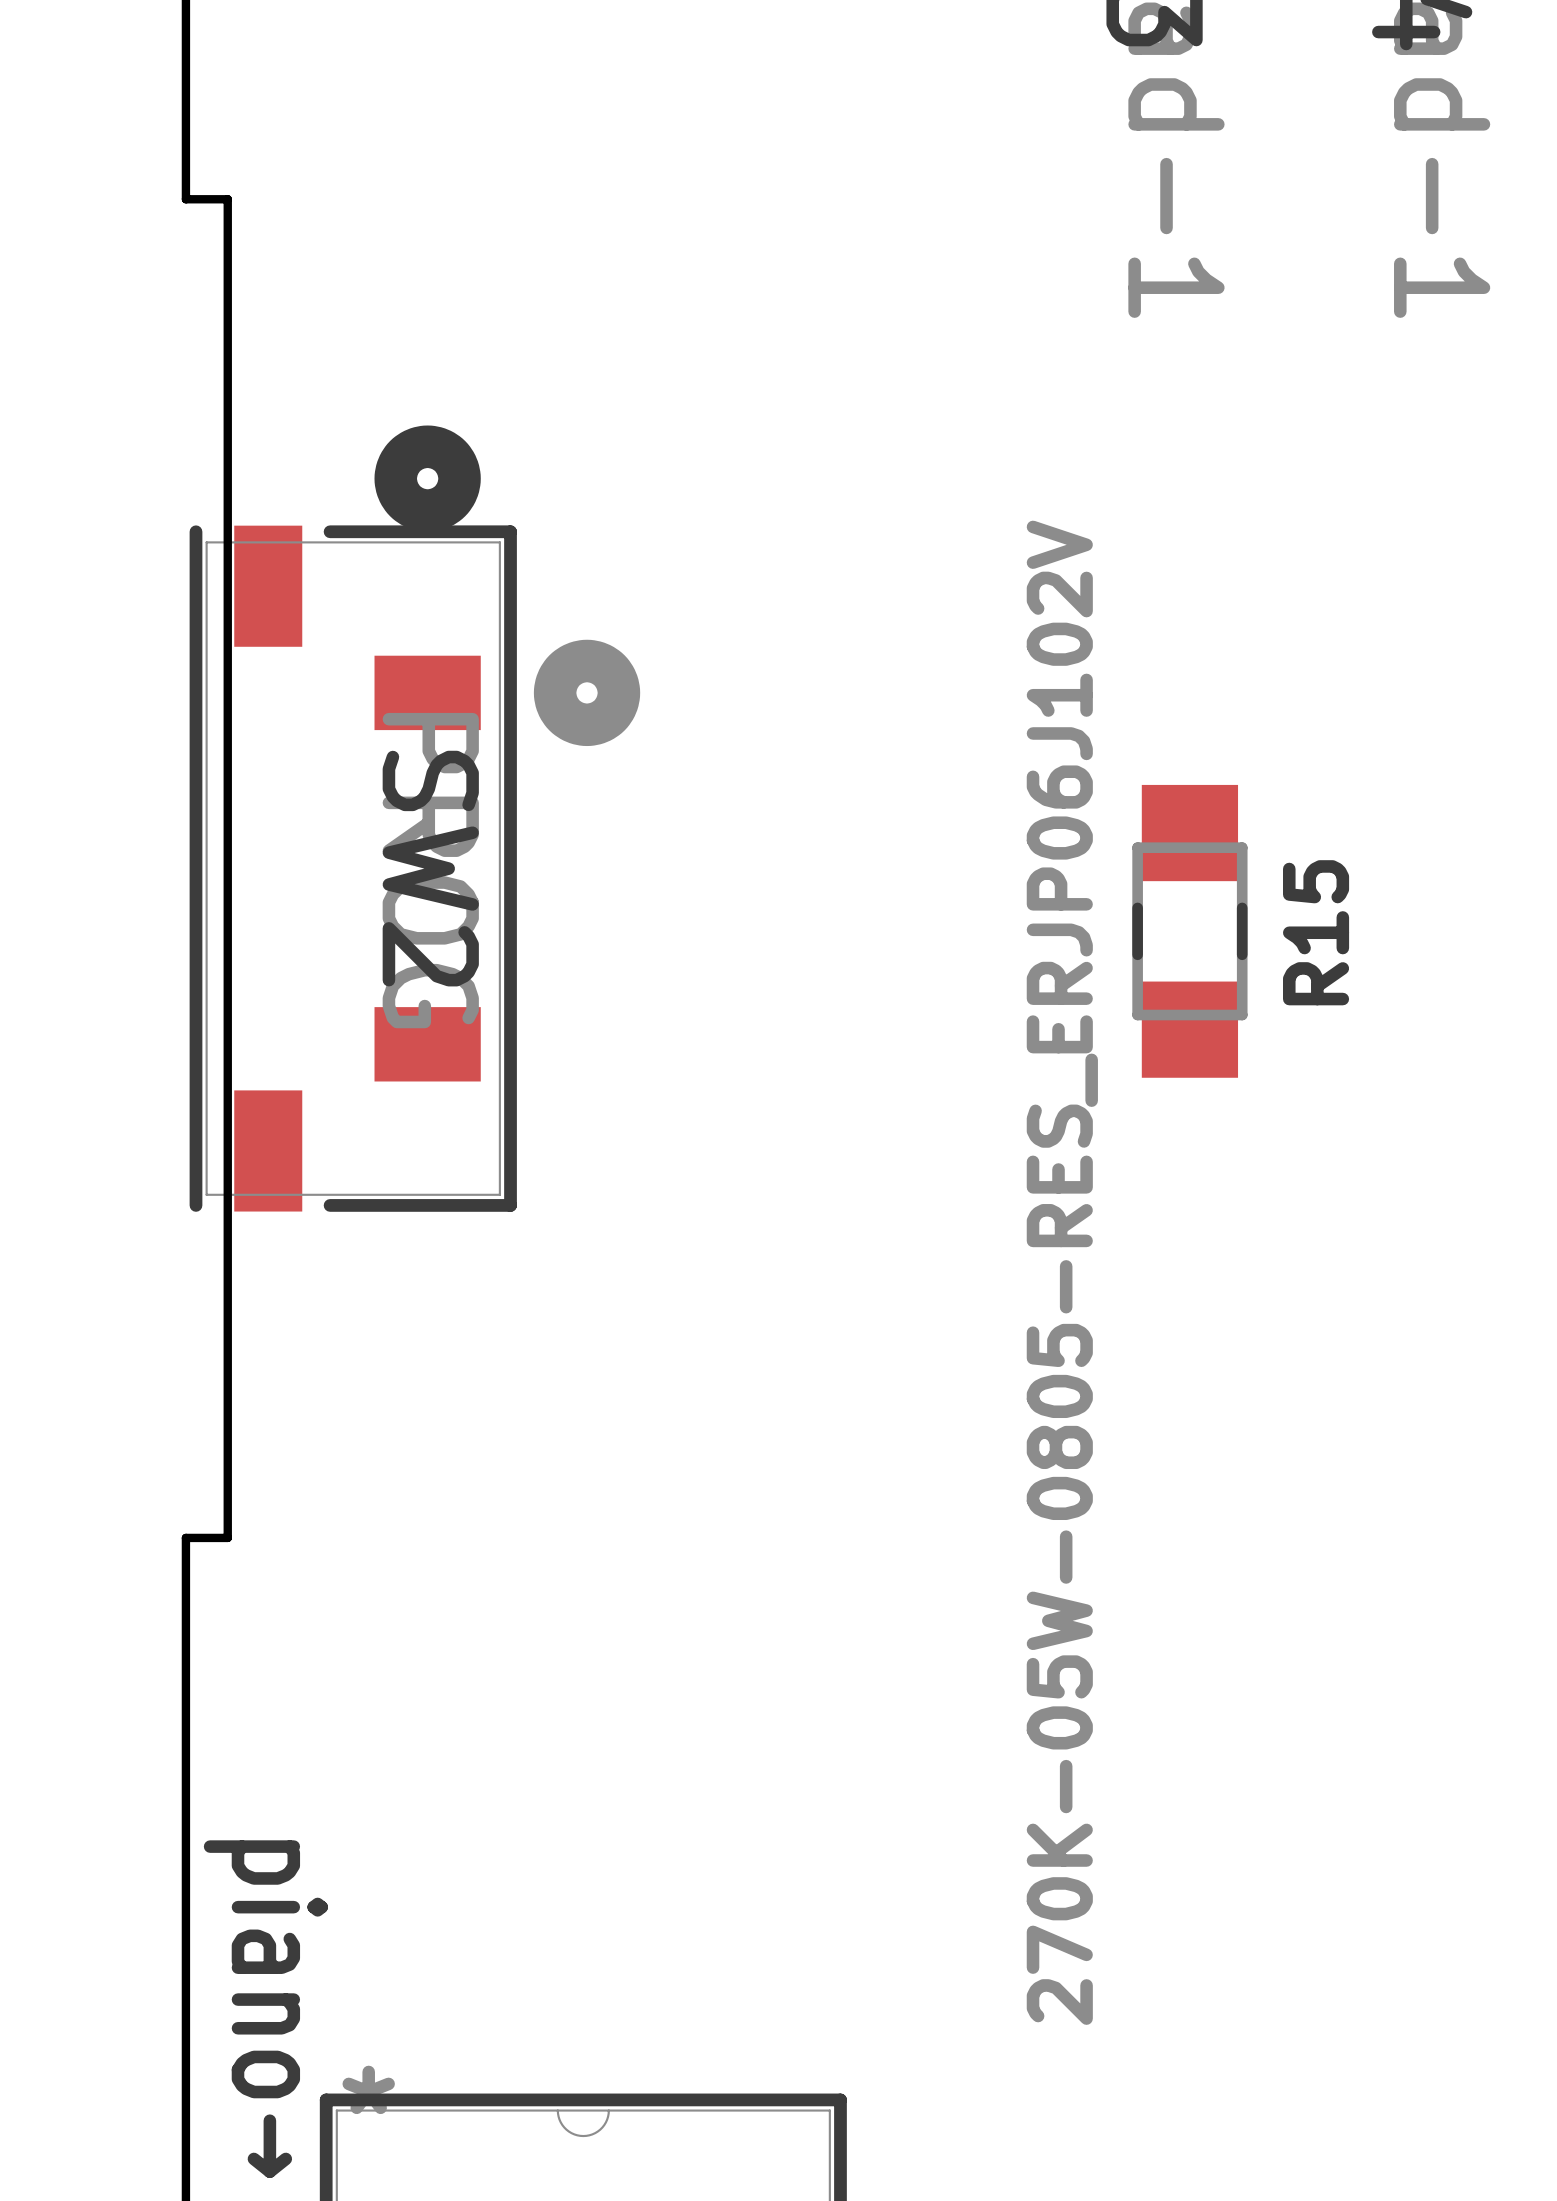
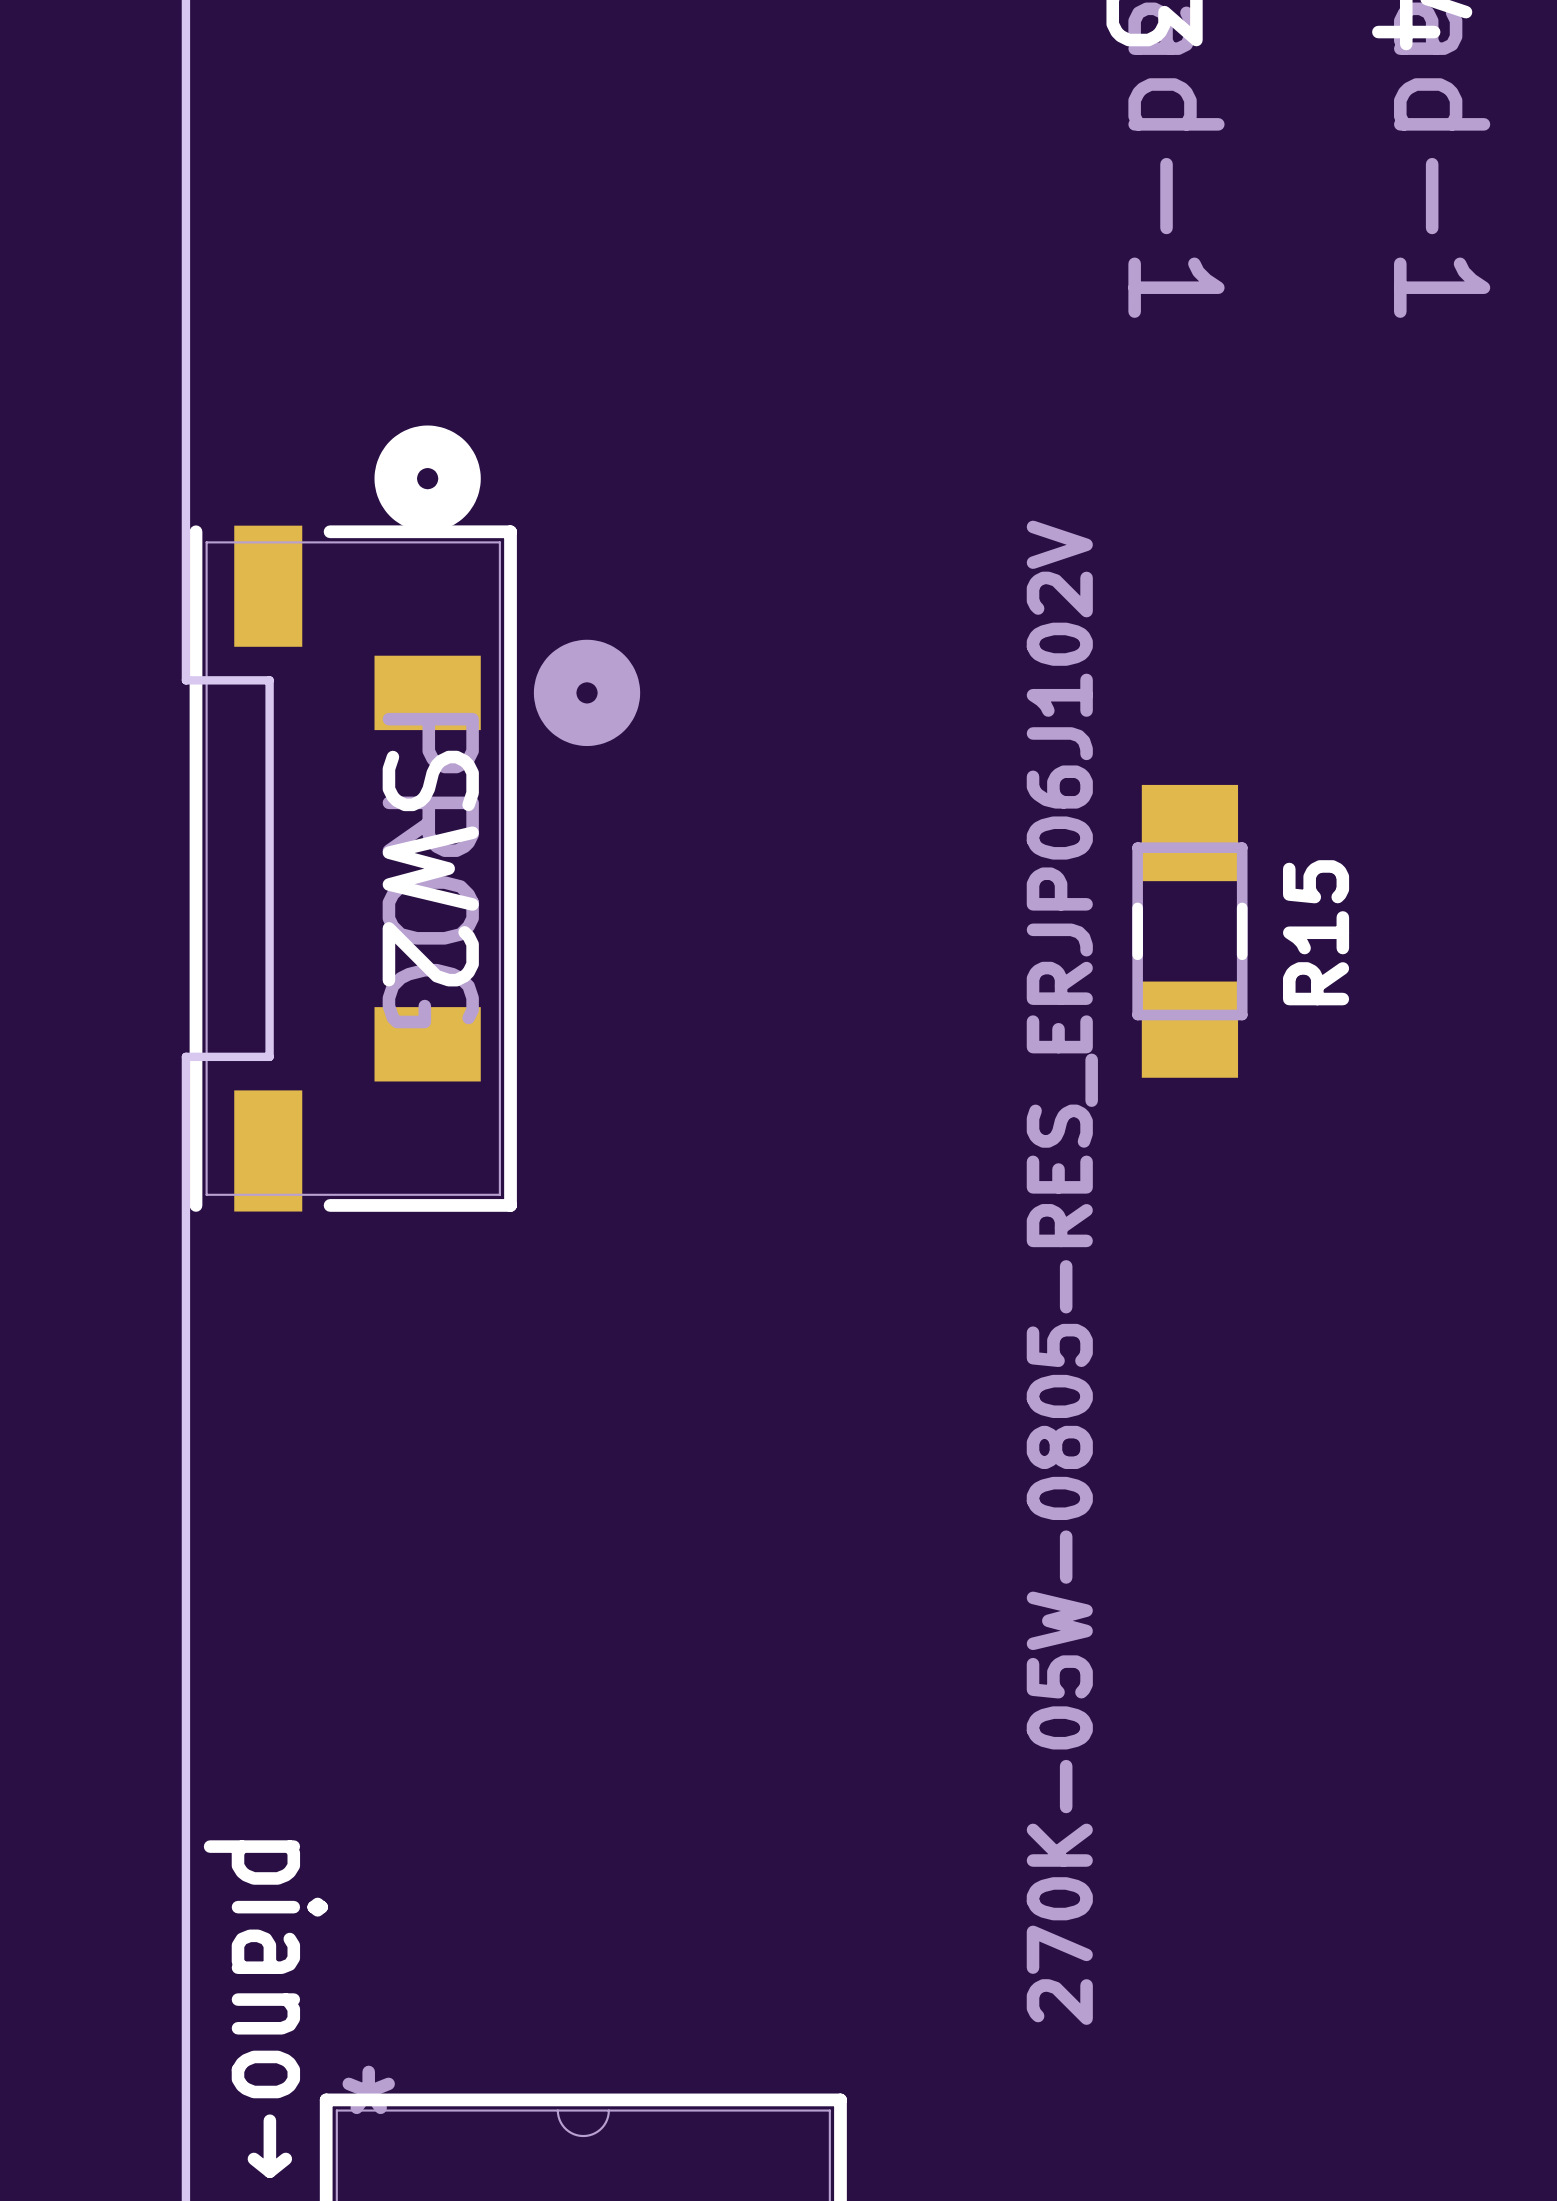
board edge: (185, 199) (227, 199) (227, 1537) (185, 1537) -> (185, 199) (185, 680) (269, 680) (269, 1056) (185, 1056) (185, 1537)

